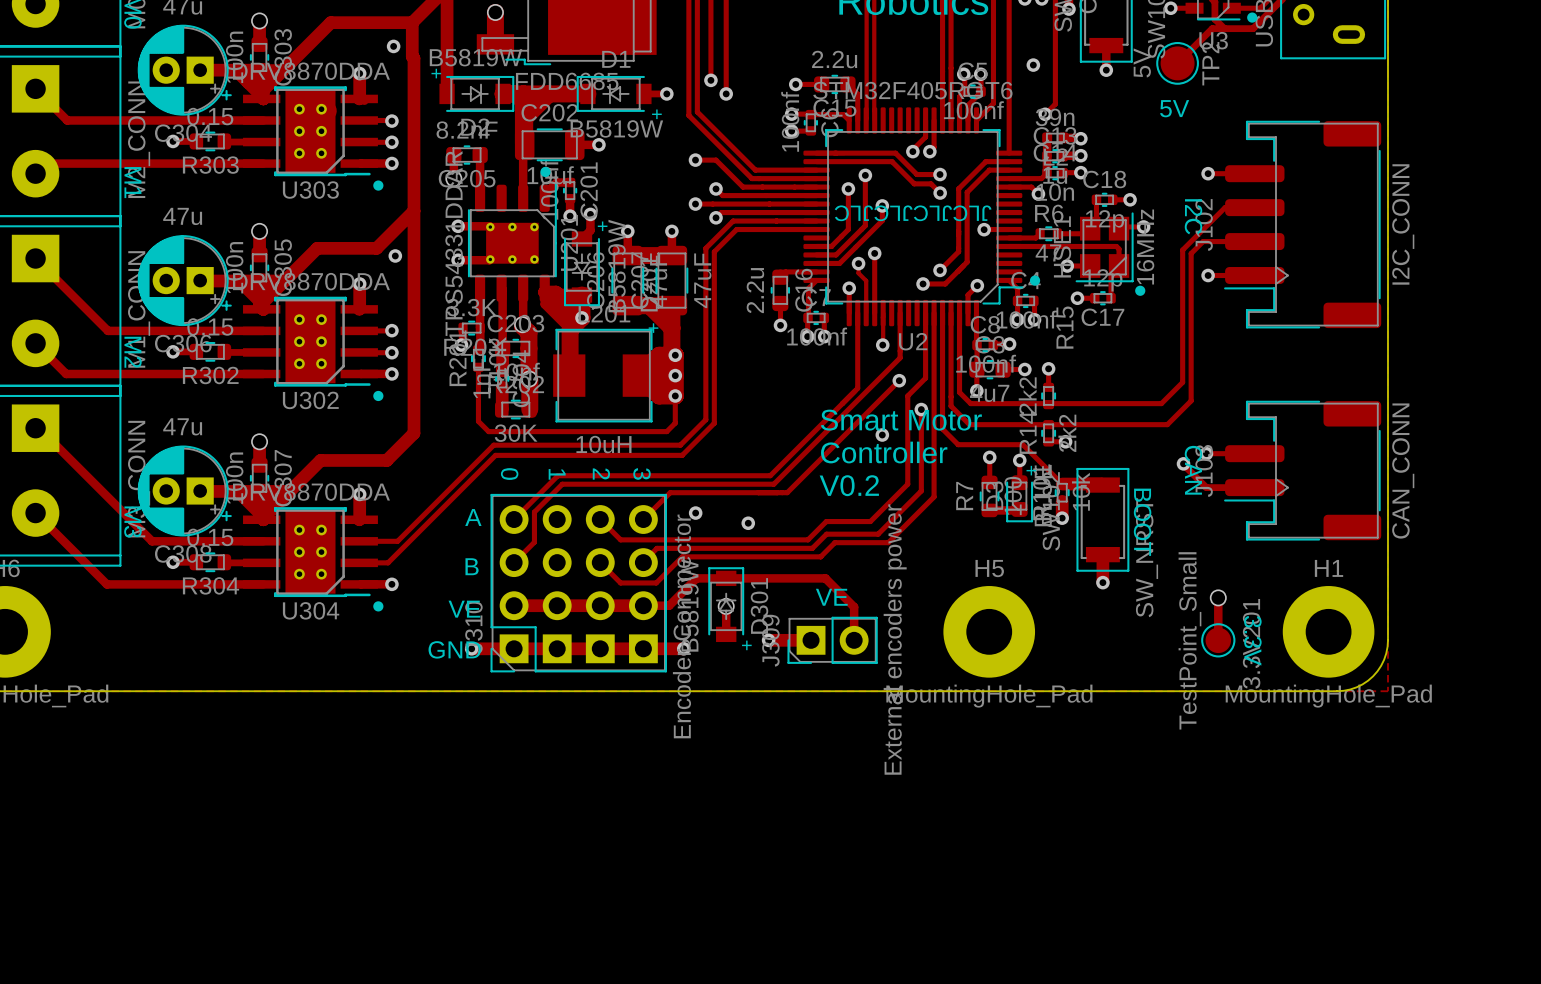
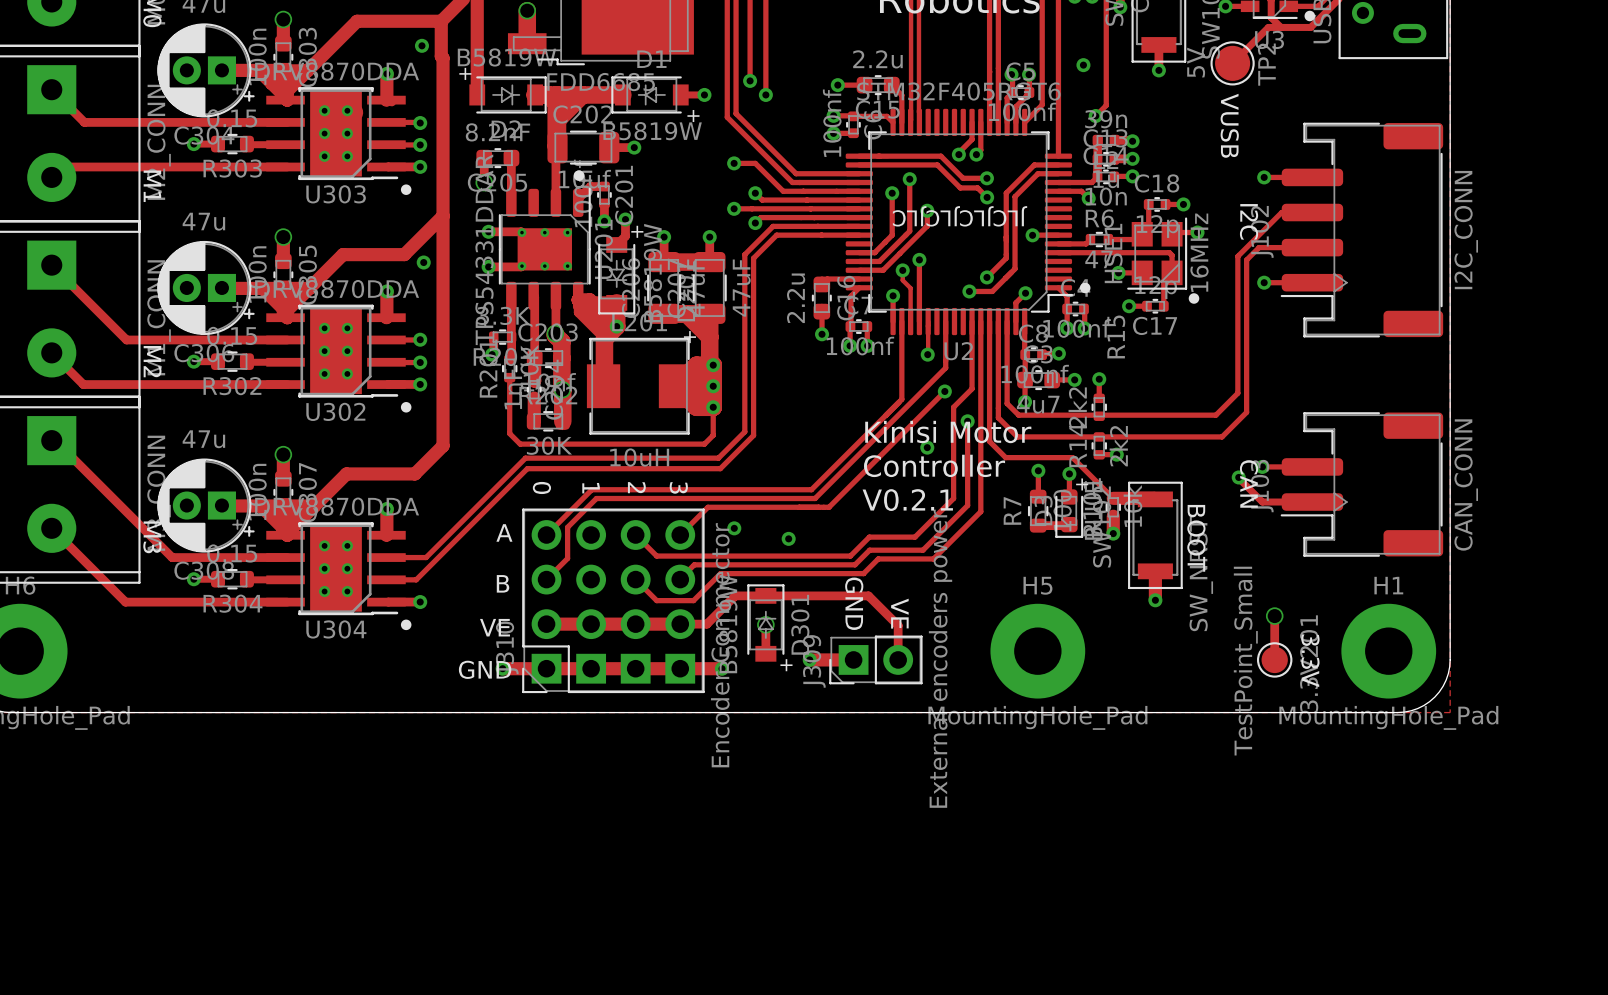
text: 5V (1174, 108) -> VUSB (1229, 125)
text: Smart Motor (901, 420) -> Kinisi Motor (948, 432)
text: V0.2 (849, 485) -> V0.2.1 (907, 500)
text: none -> GND (854, 603)
text rotation: 0° (831, 597) -> 90° clockwise (899, 613)

